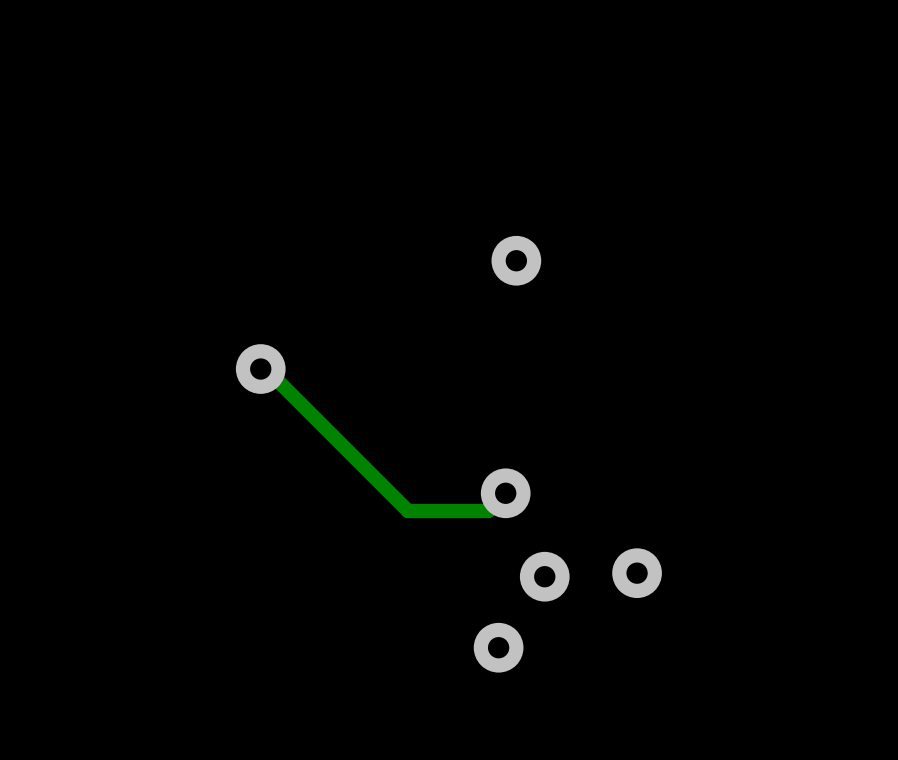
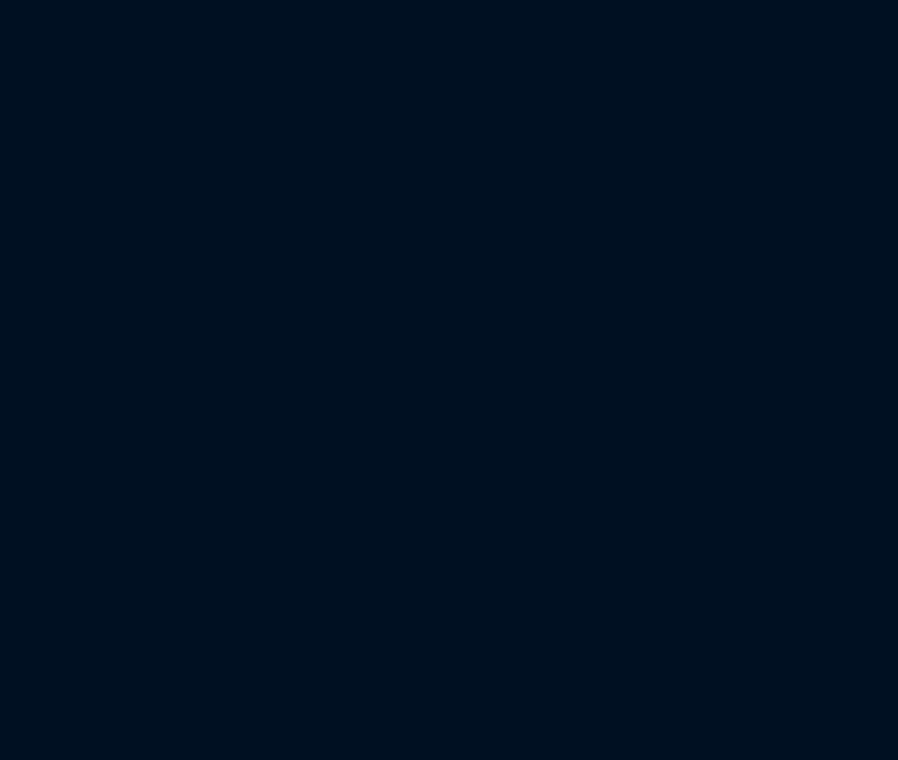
via: (516, 260) -> none
track: (260, 369) (266, 369) (408, 511) (487, 511) (505, 493) -> none
via: (260, 369) -> none
via: (505, 493) -> none
via: (637, 573) -> none
via: (544, 576) -> none
via: (498, 647) -> none

